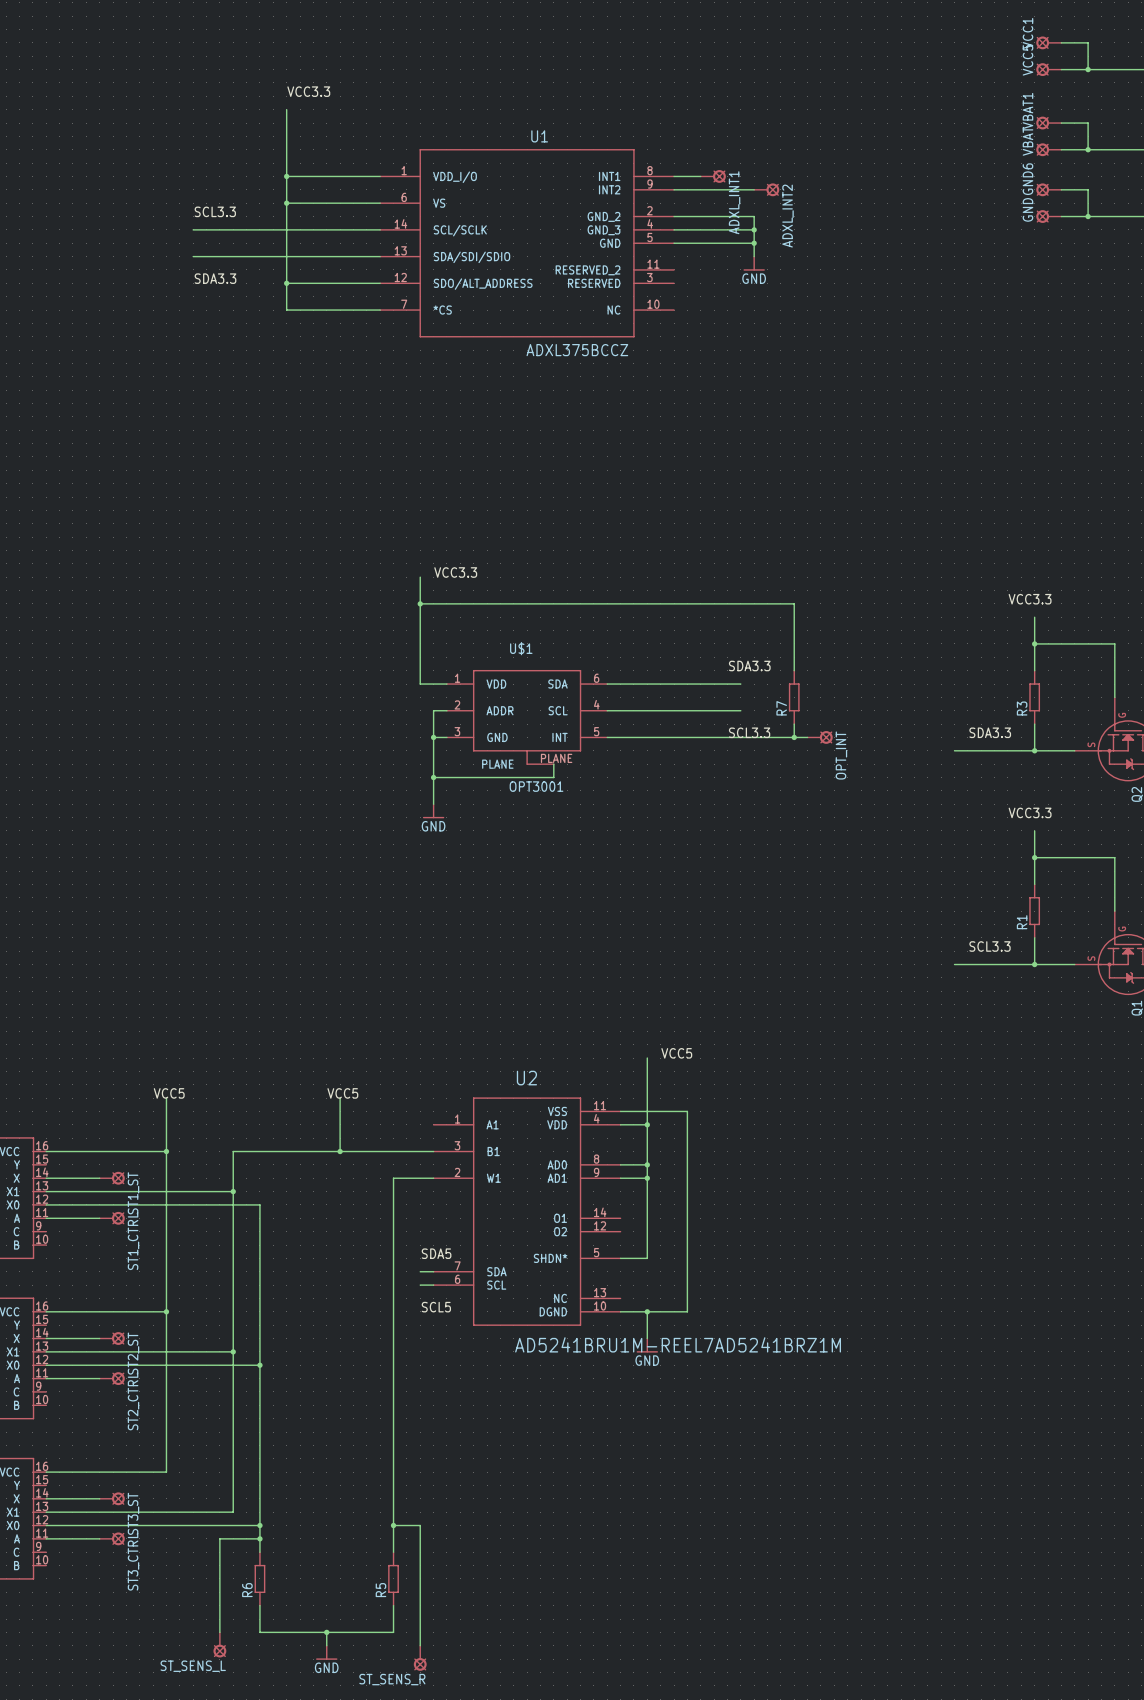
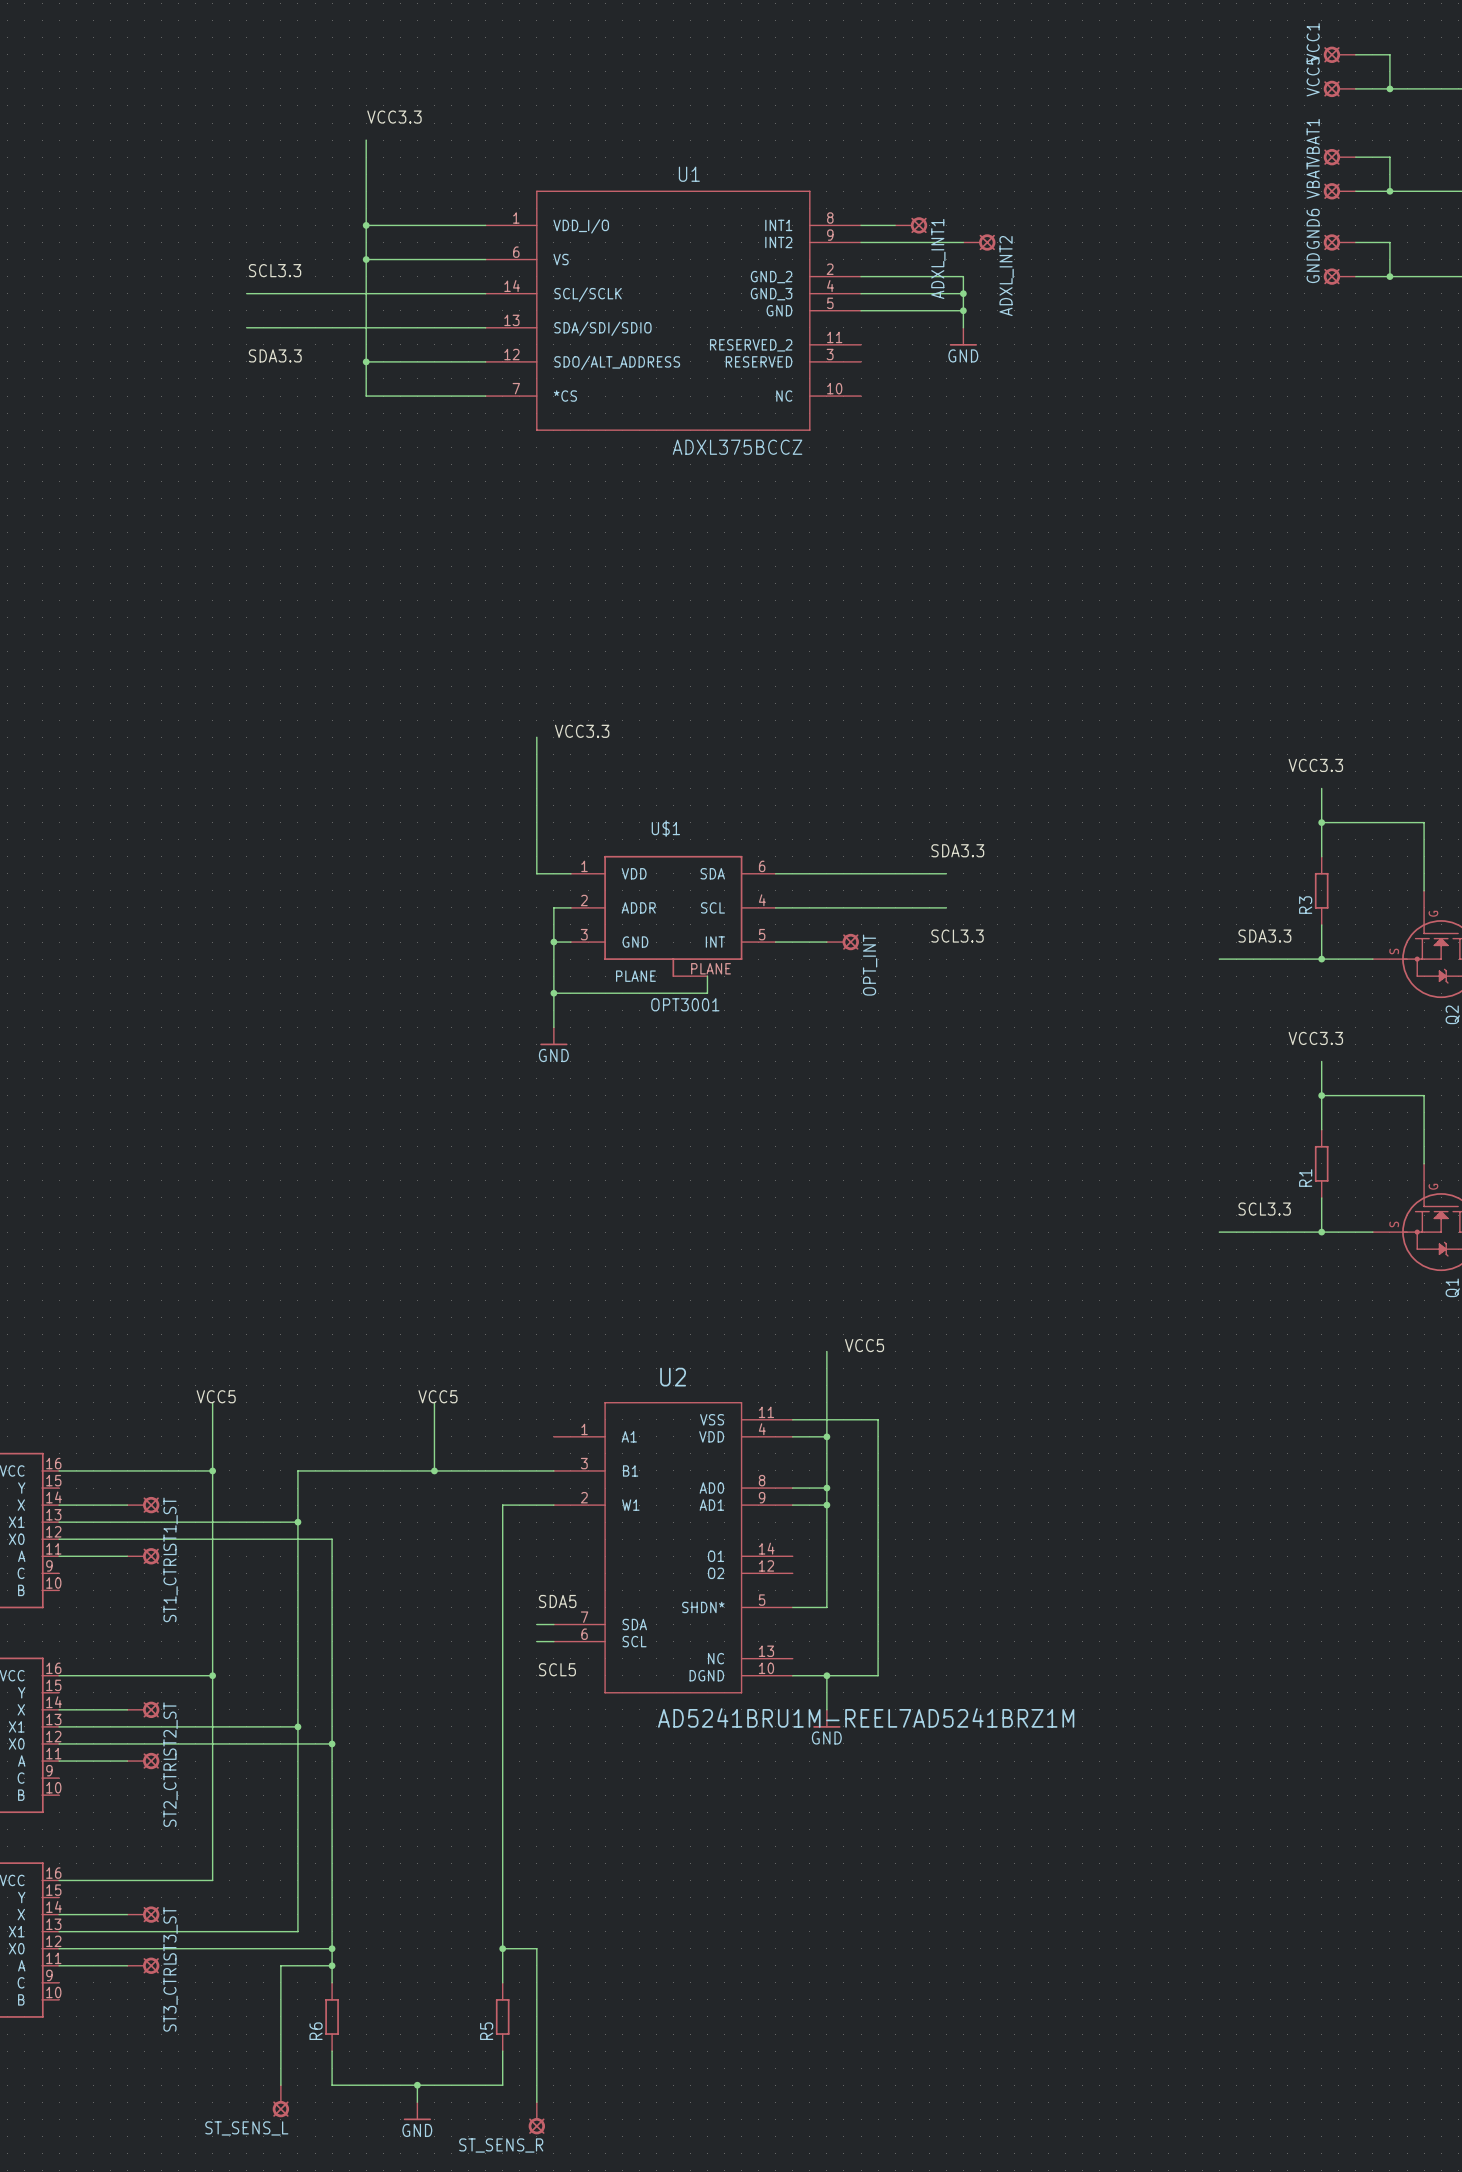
wire: (420, 603) (794, 603) (794, 670) -> none
junction: (420, 603) -> none
R7: (794, 697) -> none
wire: (794, 724) (794, 737) -> none
wire: (647, 737) (807, 737) -> none
OPT_INT: none -> (842, 942)
junction: (794, 737) -> none
OPT_INT: (820, 737) -> none

